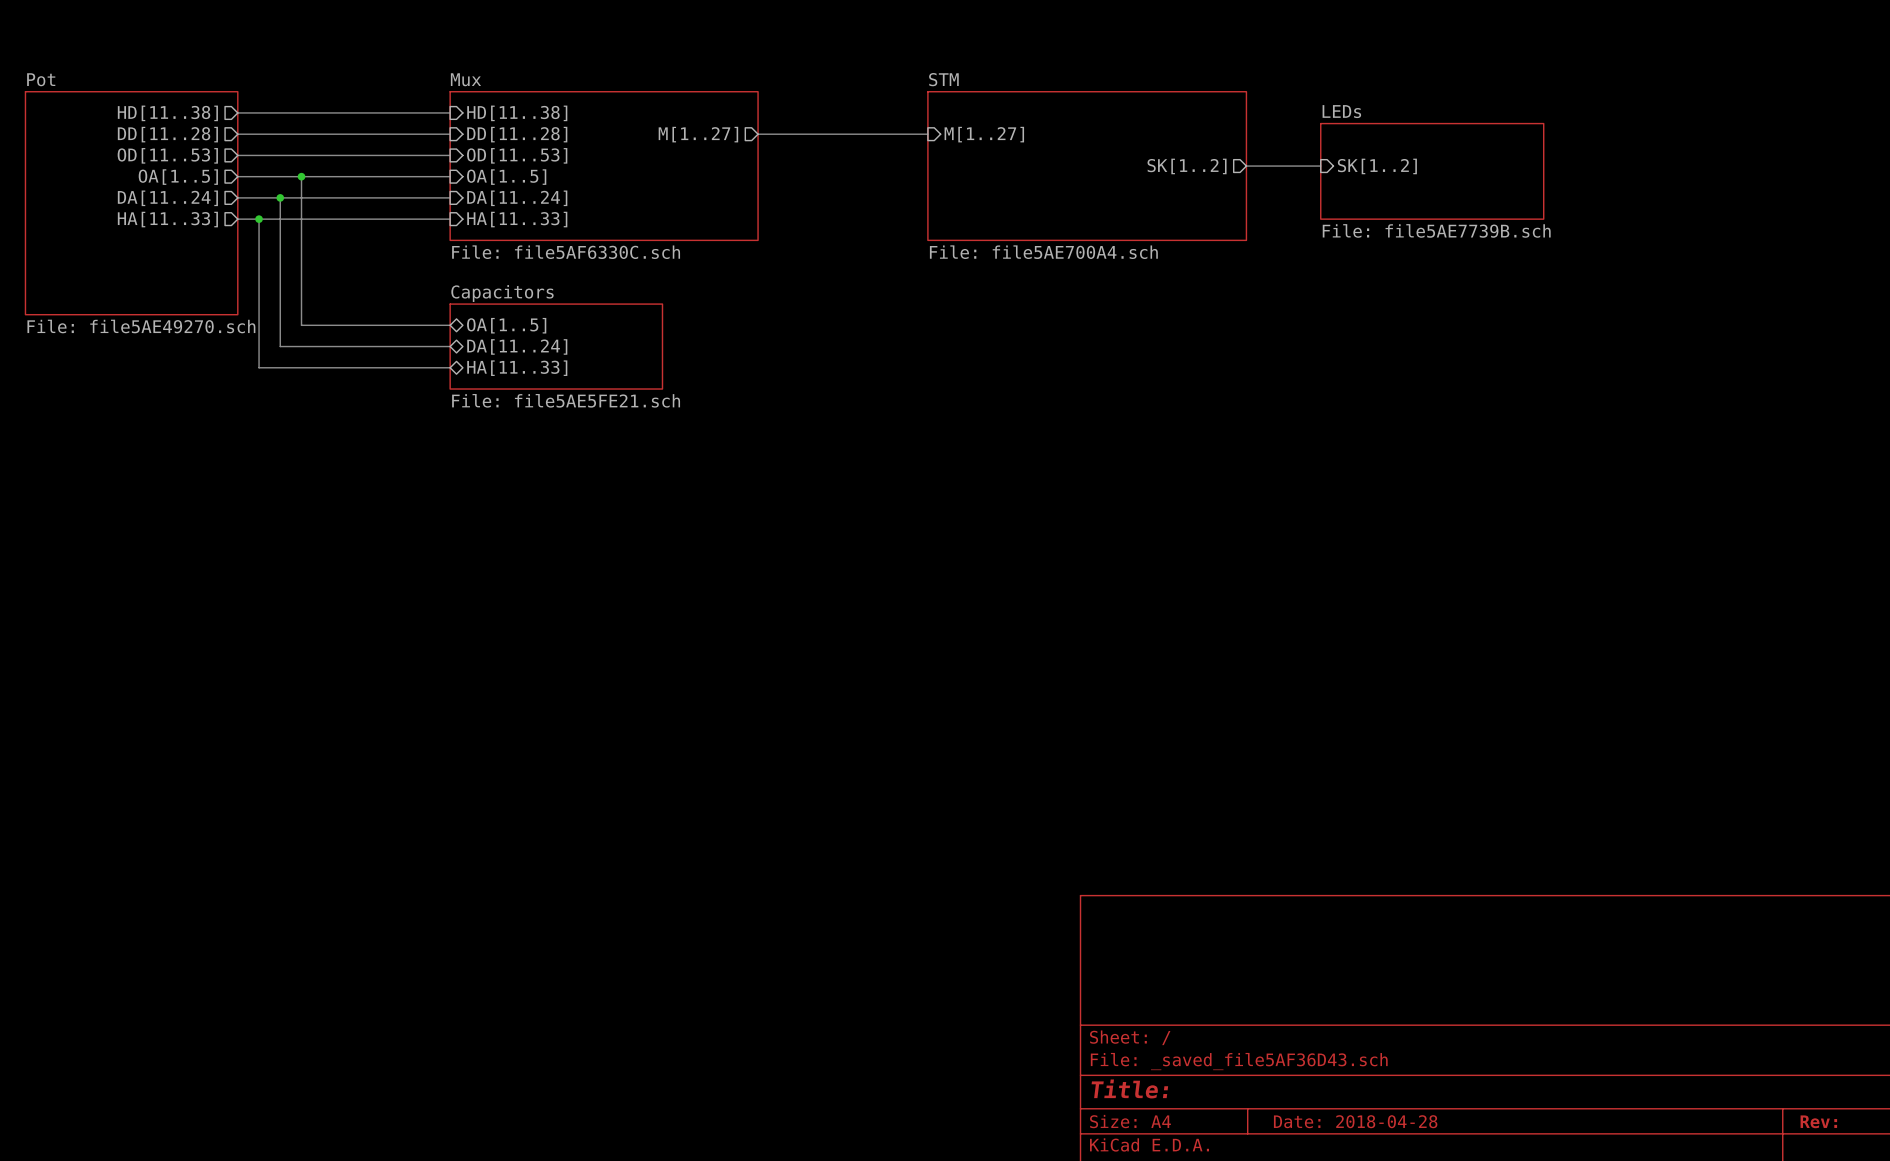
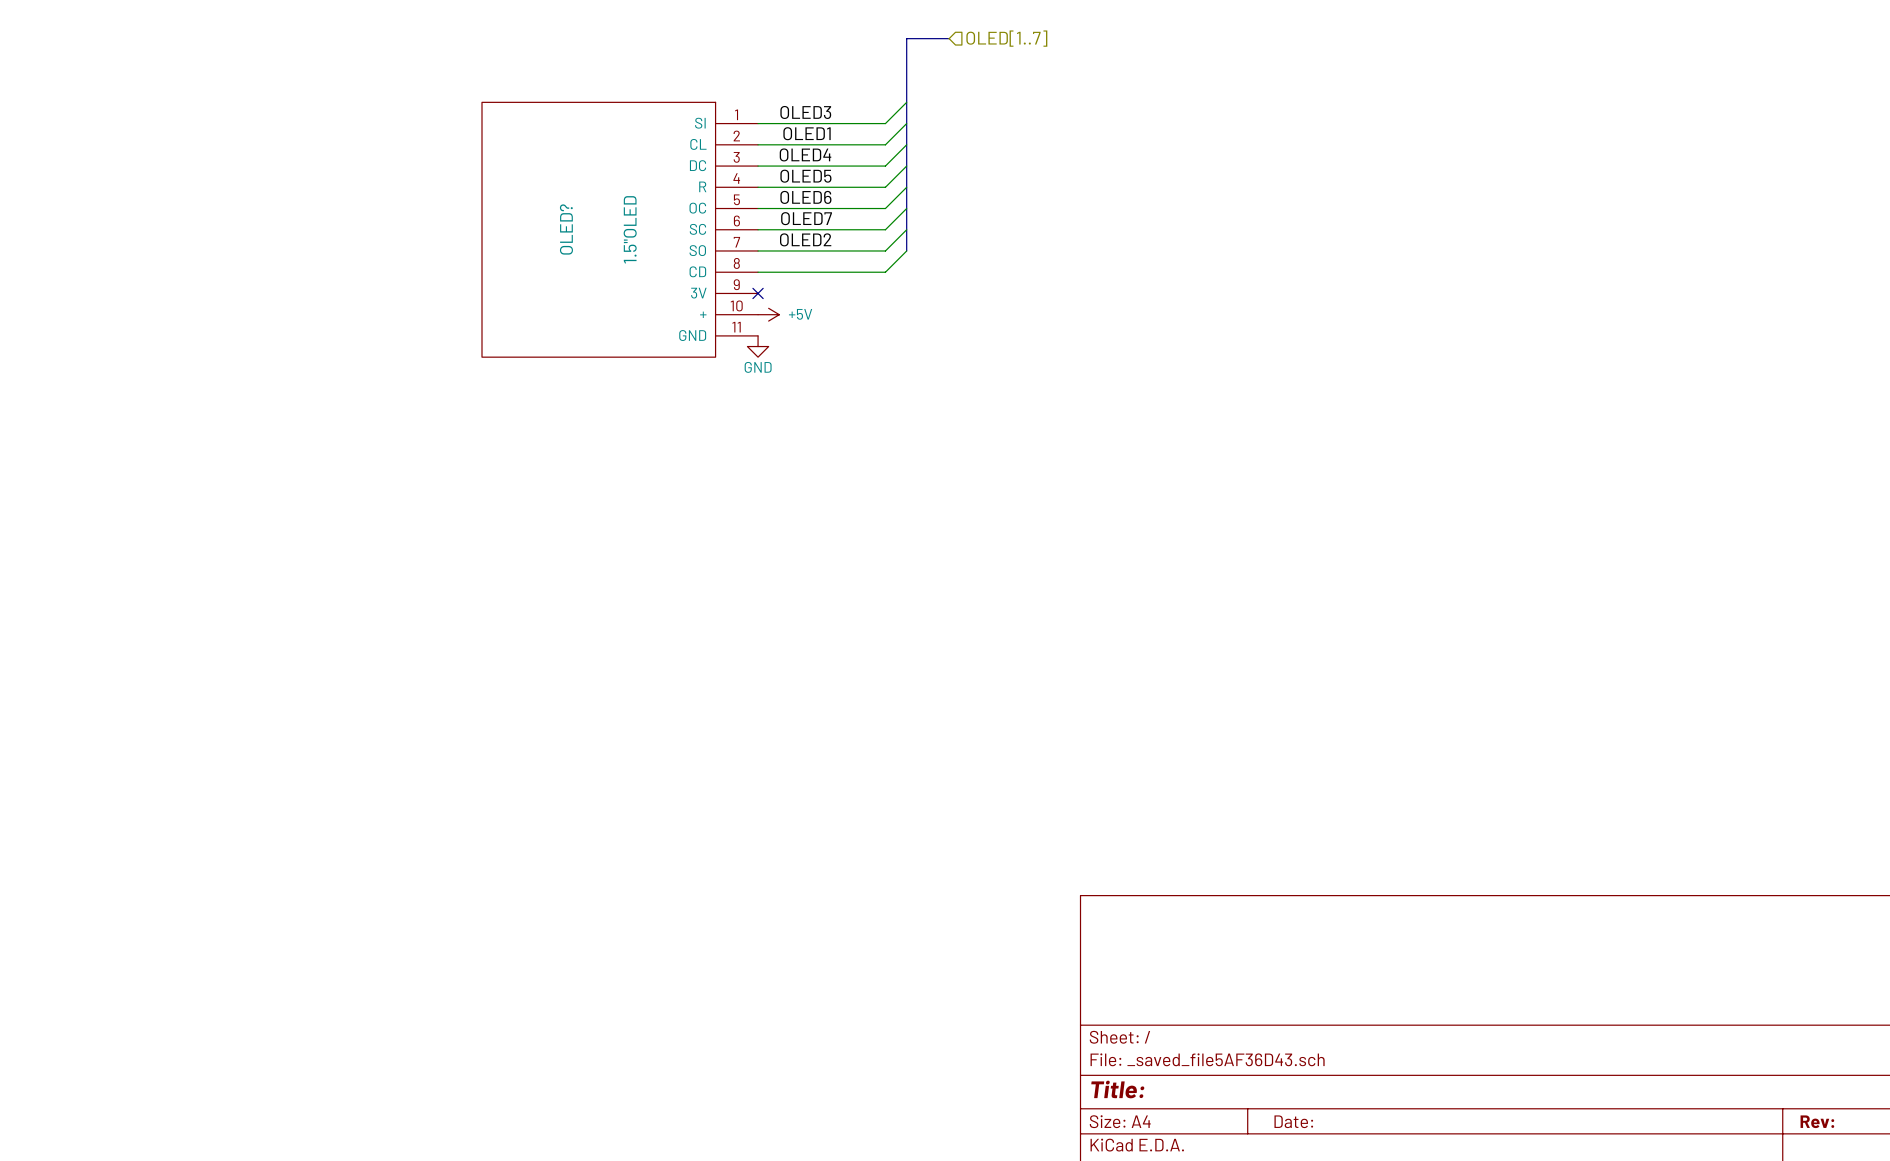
bus: none -> (949, 38) (906, 38) (906, 250)
hierarchical label: none -> OLED[1..7] (1006, 38)
wire: none -> (906, 102) (885, 123) (758, 123)
bus: (237, 112) (450, 112) -> none
label: none -> OLED3 (805, 112)
sheet pin: HD[11..38] (167, 113) -> none
sheet pin: HD[11..38] (517, 113) -> none
wire: none -> (906, 123) (885, 144) (758, 144)
label: none -> OLED1 (807, 133)
sheet pin: DD[11..28] (167, 134) -> none
bus: (237, 134) (450, 134) -> none
sheet pin: DD[11..28] (517, 134) -> none
sheet pin: M[1..27] (698, 134) -> none
bus: (758, 134) (927, 134) -> none
sheet pin: M[1..27] (984, 134) -> none
wire: none -> (906, 144) (885, 166) (758, 166)
label: none -> OLED4 (805, 154)
sheet pin: OD[11..53] (167, 155) -> none
bus: (237, 155) (450, 155) -> none
sheet pin: OD[11..53] (517, 155) -> none
sheet Mux: File: file5AF6330C.sch (604, 166) -> none
wire: none -> (906, 166) (885, 187) (758, 187)
sheet STM: File: file5AE700A4.sch (1087, 166) -> none
sheet pin: SK[1..2] (1187, 166) -> none
bus: (1246, 166) (1320, 166) -> none
sheet pin: SK[1..2] (1377, 166) -> none
sheet LEDs: File: file5AE7739B.sch (1432, 171) -> none
bus: (237, 176) (450, 176) -> none
bus: (301, 176) (301, 325) (450, 325) -> none
junction: (301, 176) -> none
label: none -> OLED5 (805, 176)
sheet pin: OA[1..5] (178, 177) -> none
sheet pin: OA[1..5] (506, 177) -> none
wire: none -> (906, 187) (885, 208) (758, 208)
bus: (237, 197) (450, 197) -> none
bus: (280, 197) (280, 346) (450, 346) -> none
junction: (280, 197) -> none
label: none -> OLED6 (805, 197)
sheet pin: DA[11..24] (167, 198) -> none
sheet pin: DA[11..24] (517, 198) -> none
sheet Pot: File: file5AE49270.sch (131, 203) -> none
wire: none -> (906, 208) (885, 229) (758, 229)
label: none -> OLED7 (806, 218)
sheet pin: HA[11..33] (167, 219) -> none
bus: (237, 219) (450, 219) -> none
bus: (259, 219) (259, 367) (450, 367) -> none
junction: (259, 219) -> none
sheet pin: HA[11..33] (517, 219) -> none
OLED?: none -> 1.5"OLED (620, 229)
wire: none -> (906, 229) (885, 250) (758, 250)
label: none -> OLED2 (805, 239)
wire: none -> (906, 250) (885, 272) (758, 272)
no-connect mark: none -> (758, 293)
power symbol: none -> +5V (768, 314)
sheet pin: OA[1..5] (506, 325) -> none
sheet pin: DA[11..24] (517, 346) -> none
sheet Capacitors: File: file5AE5FE21.sch (556, 346) -> none
power symbol: none -> GND (758, 346)
sheet pin: HA[11..33] (517, 368) -> none
title block: Date: 2018-04-28 (1355, 1121) -> Date: (1293, 1121)

